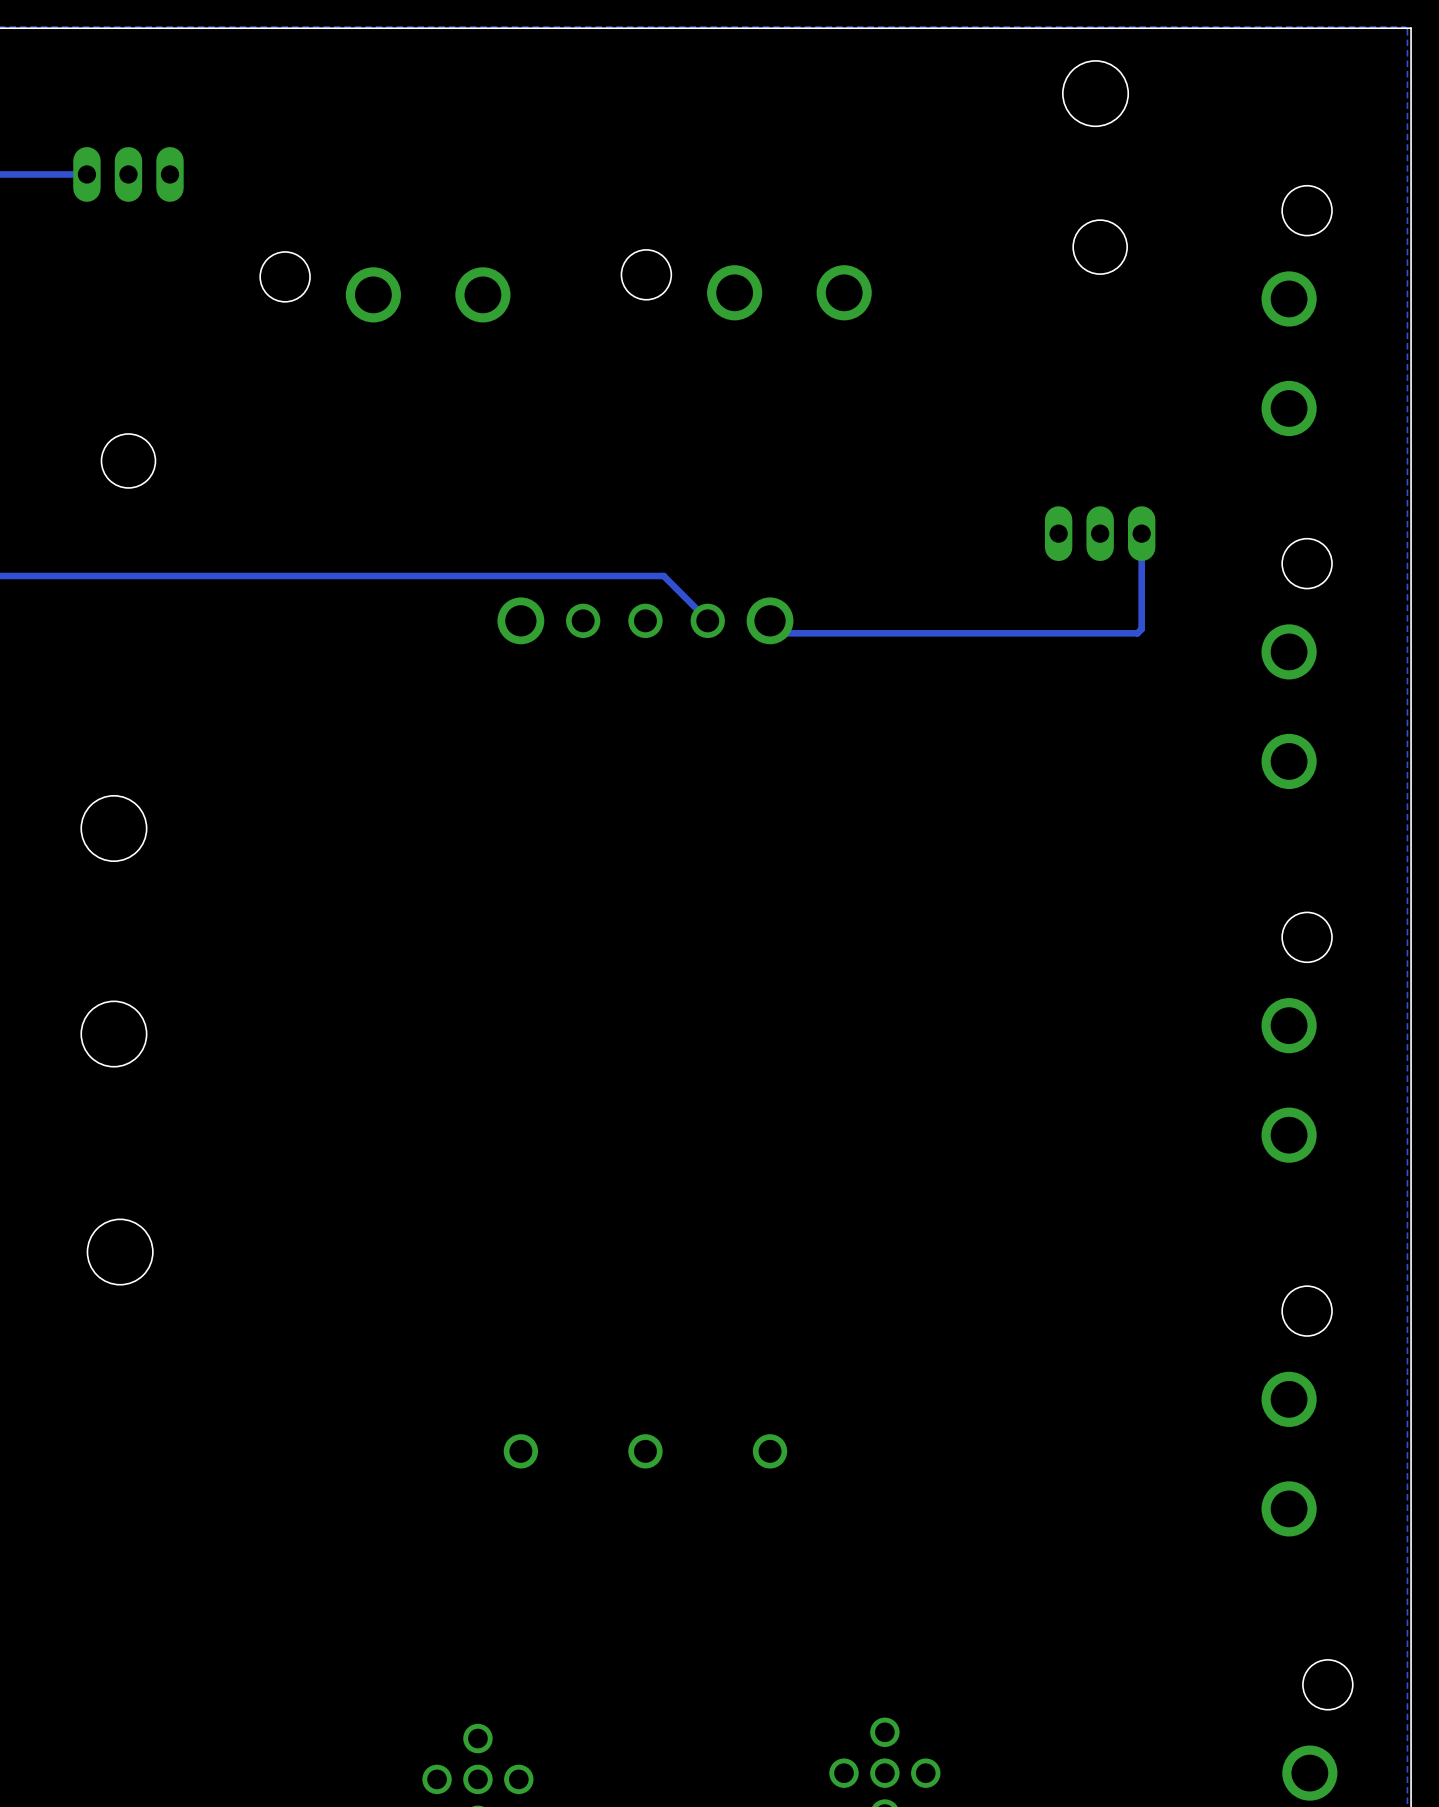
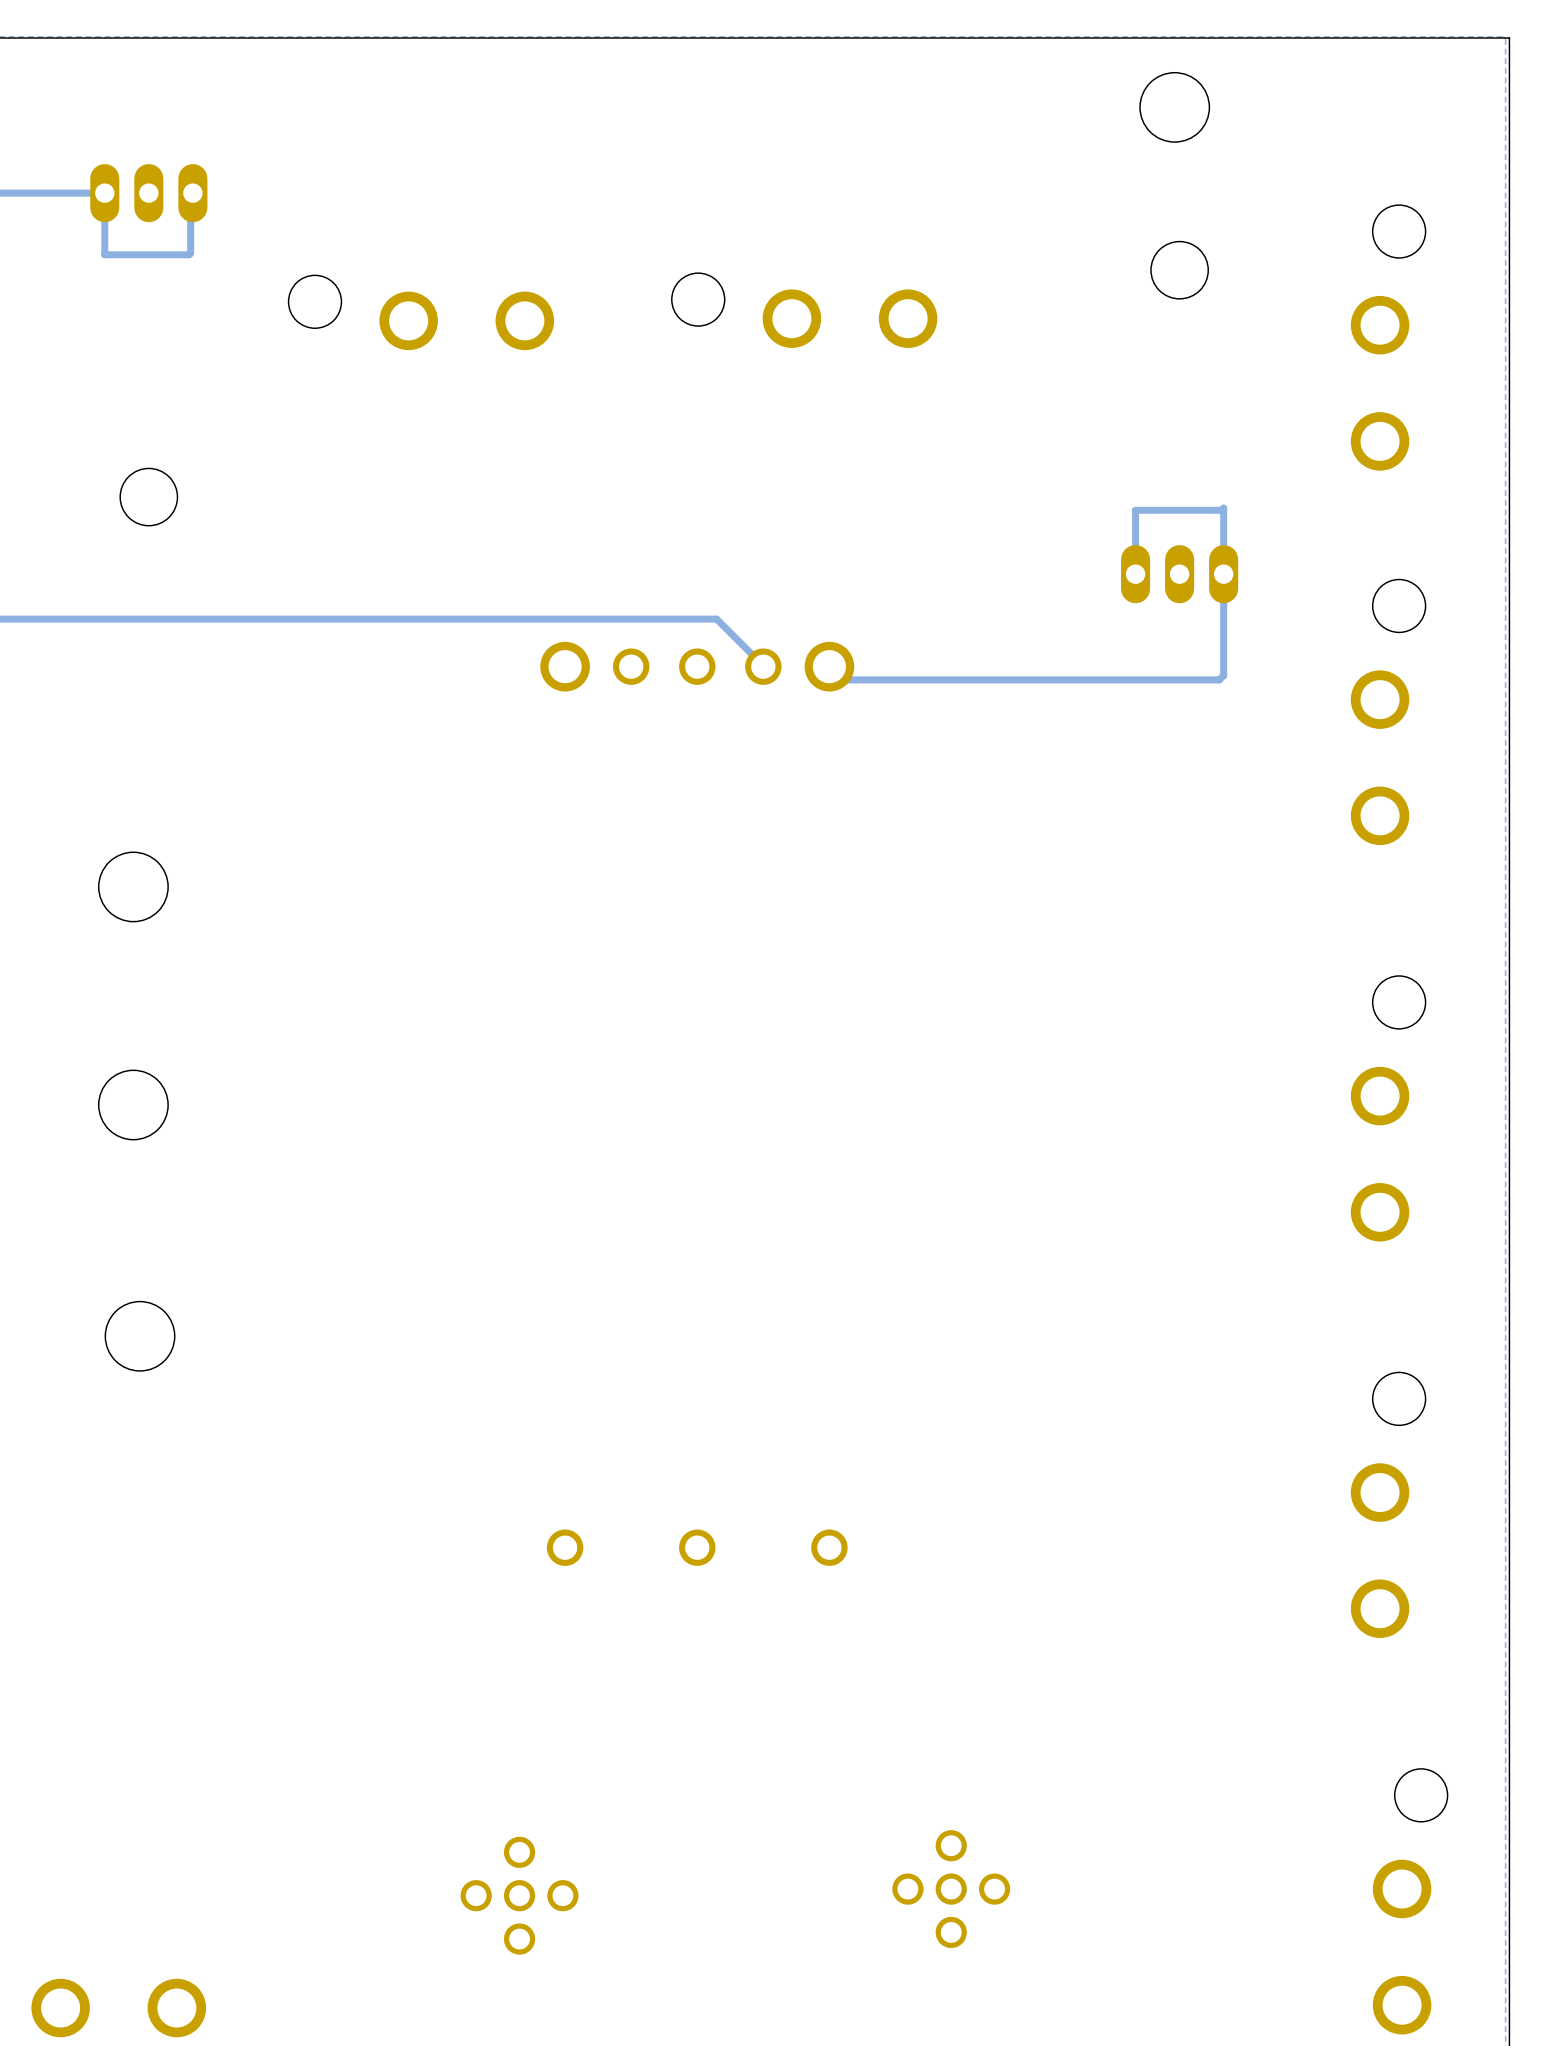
track: none -> (192, 193) (190, 195) (190, 252) (188, 254) (104, 254) (104, 193)
track: none -> (1223, 574) (1223, 508) (1221, 510) (1135, 510) (1135, 574)

